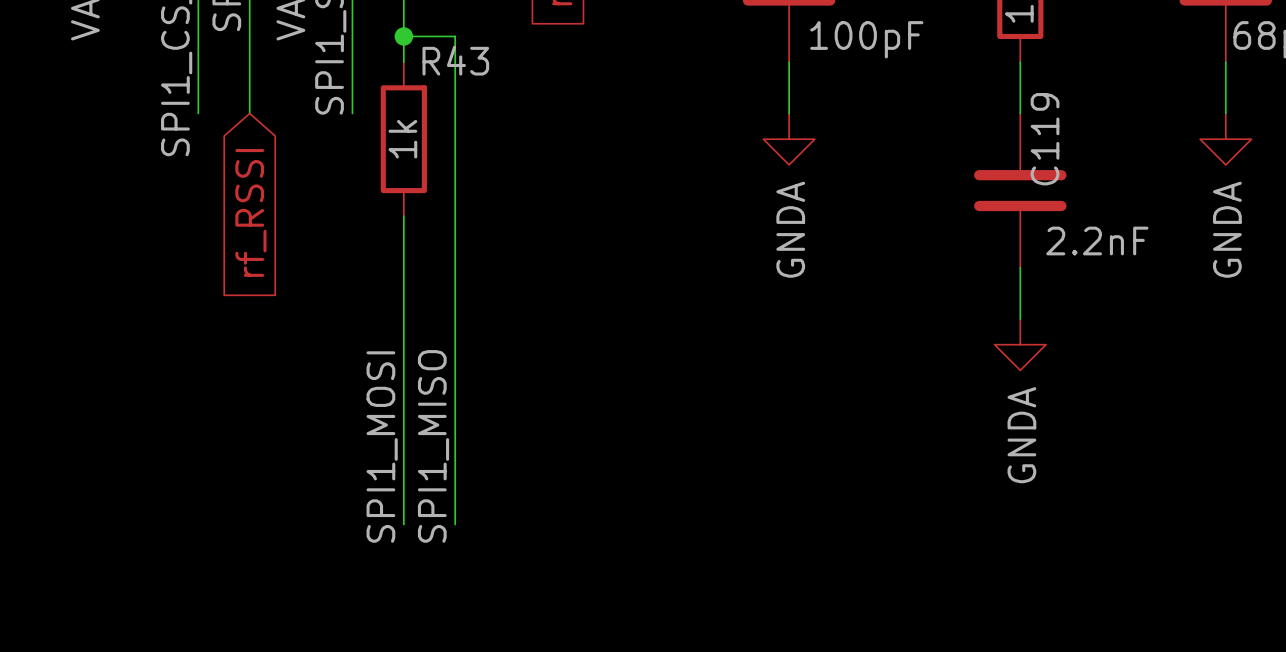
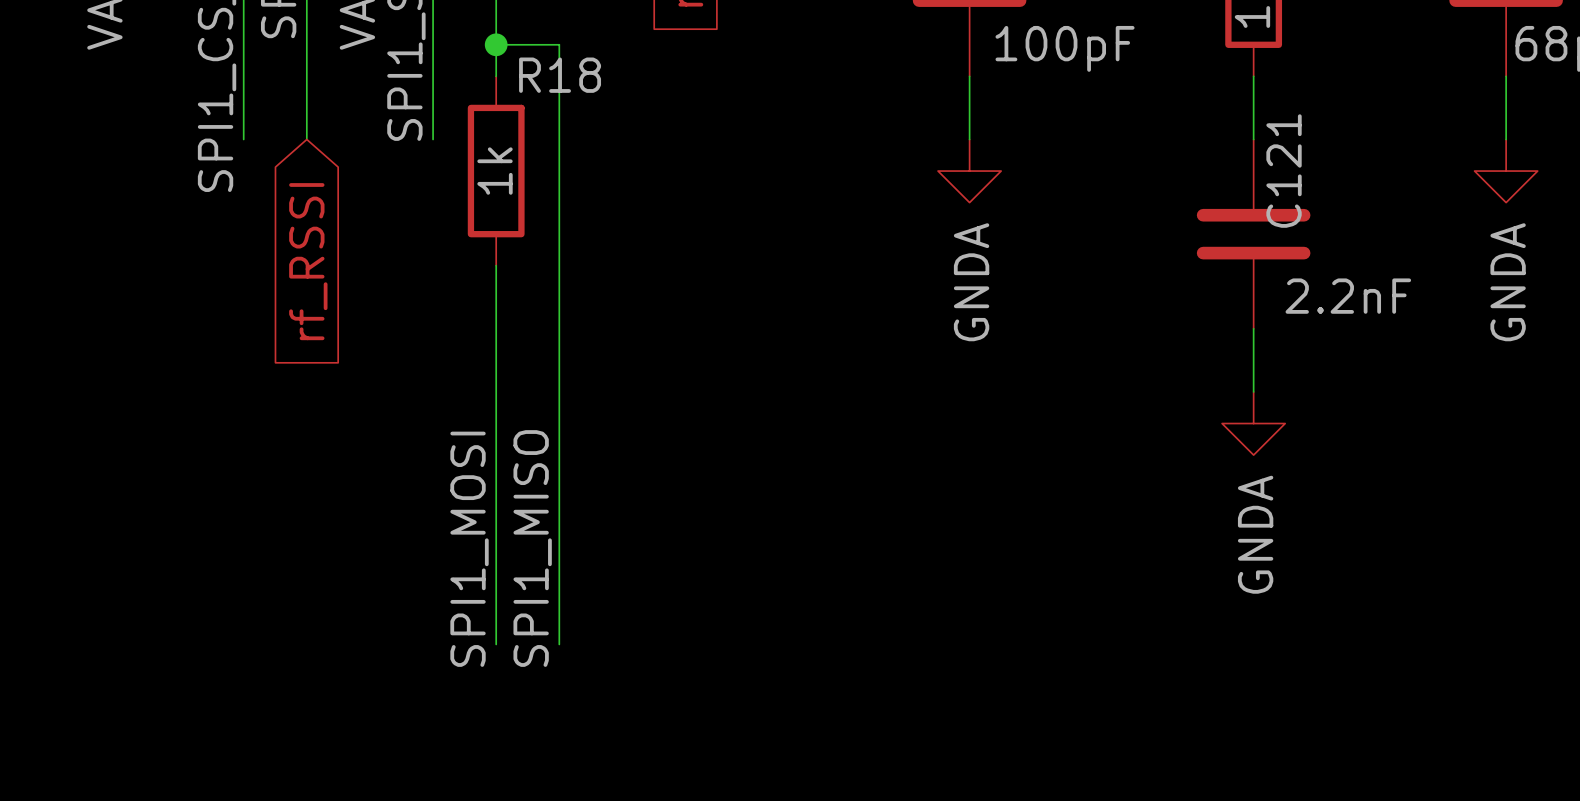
R43 name: R43 (455, 60) -> R18 (560, 75)
C119 name: C119 (1045, 139) -> C121 (1284, 171)

